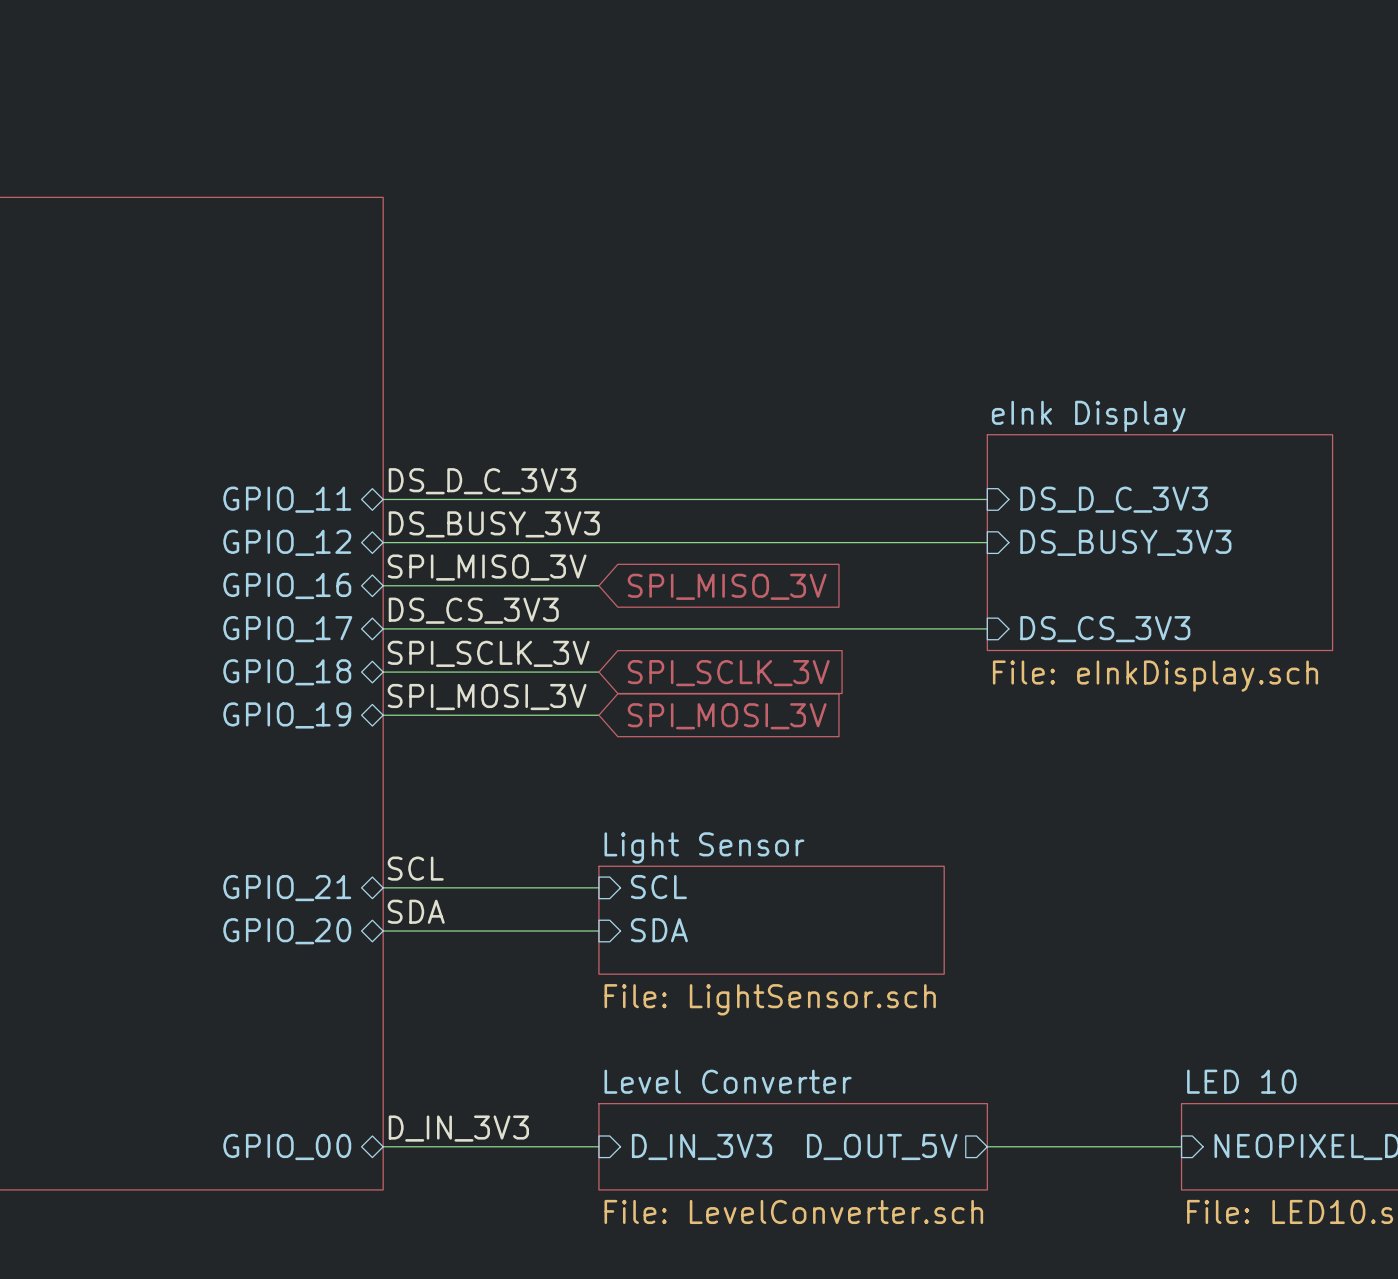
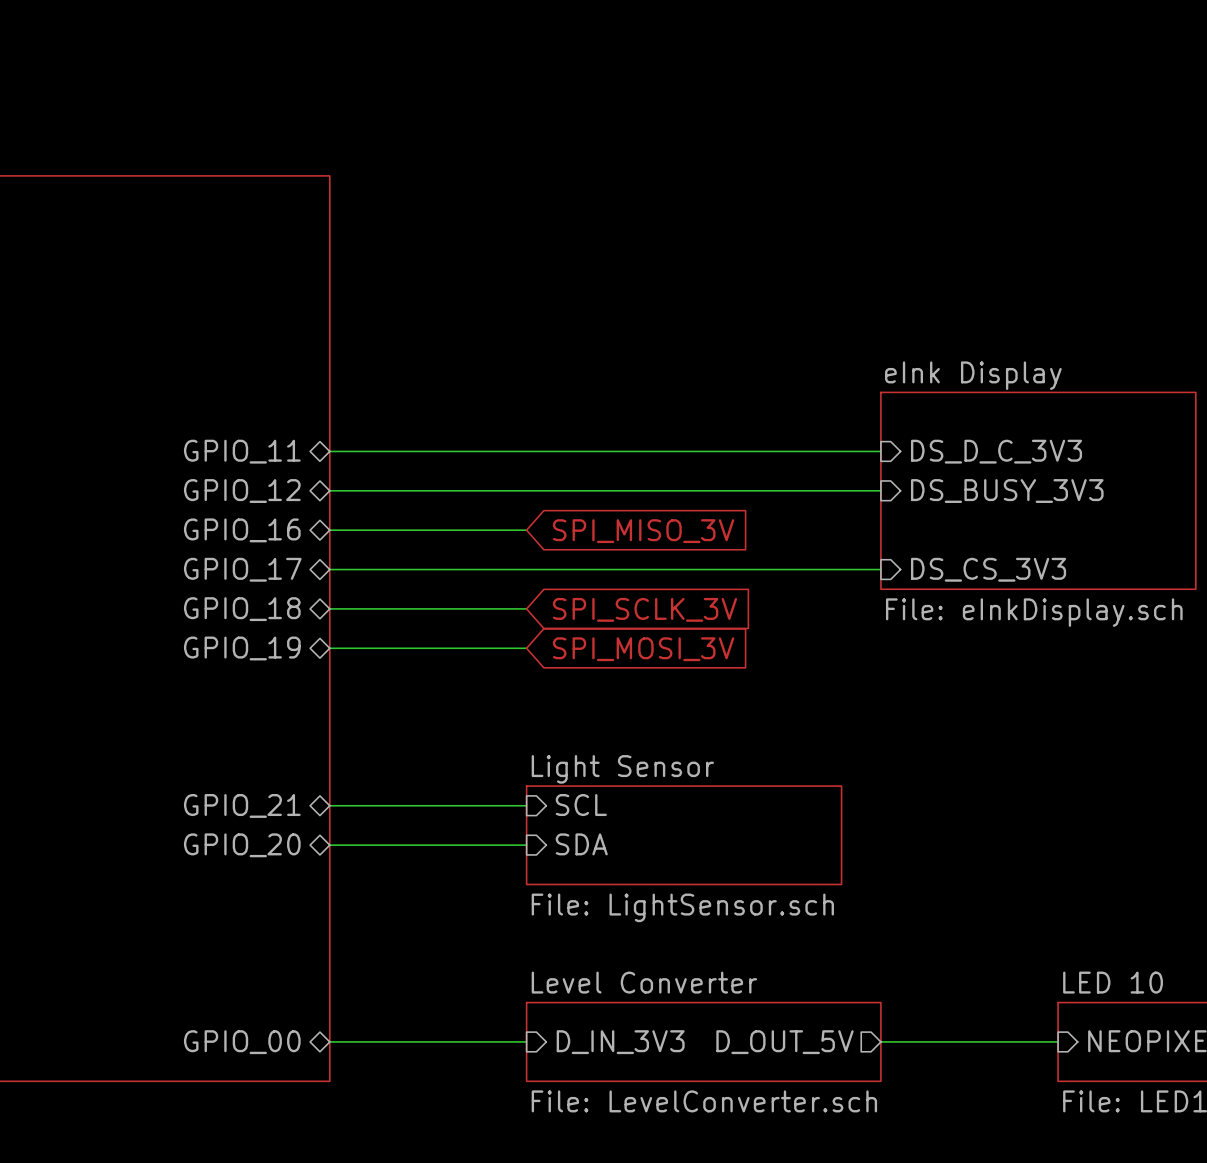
label: DS_D_C_3V3 (482, 481) -> none
label: DS_BUSY_3V3 (494, 524) -> none
label: SPI_MISO_3V (487, 567) -> none
label: DS_CS_3V3 (473, 610) -> none
label: SPI_SCLK_3V (488, 653) -> none
label: SPI_MOSI_3V (487, 697) -> none
label: SCL (415, 868) -> none
label: SDA (416, 911) -> none
label: D_IN_3V3 (458, 1128) -> none

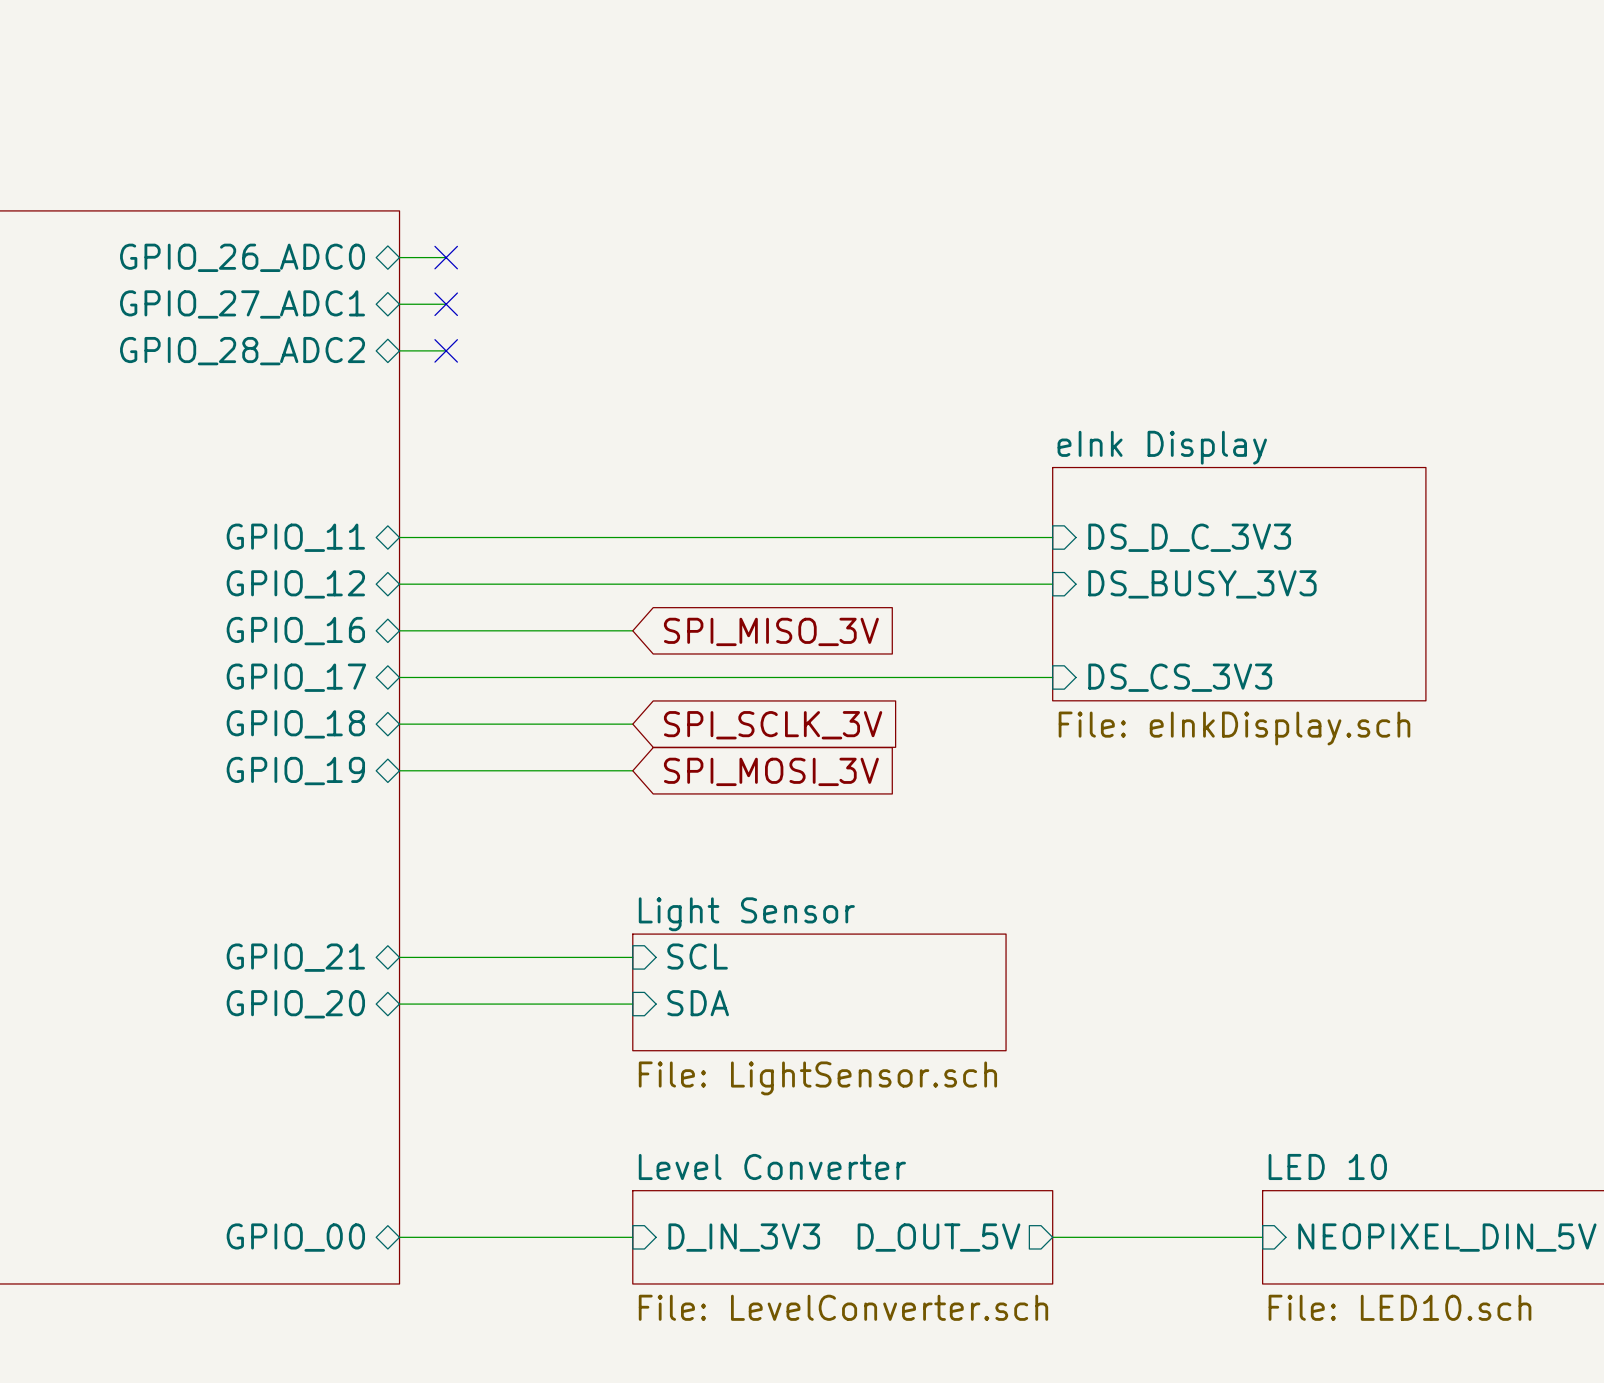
sheet pin: none -> GPIO_26_ADC0 (242, 257)
wire: none -> (399, 257) (446, 257)
no-connect mark: none -> (446, 257)
sheet pin: none -> GPIO_27_ADC1 (242, 304)
wire: none -> (399, 304) (446, 304)
no-connect mark: none -> (446, 304)
wire: none -> (399, 350) (446, 350)
no-connect mark: none -> (446, 350)
sheet pin: none -> GPIO_28_ADC2 (242, 351)

